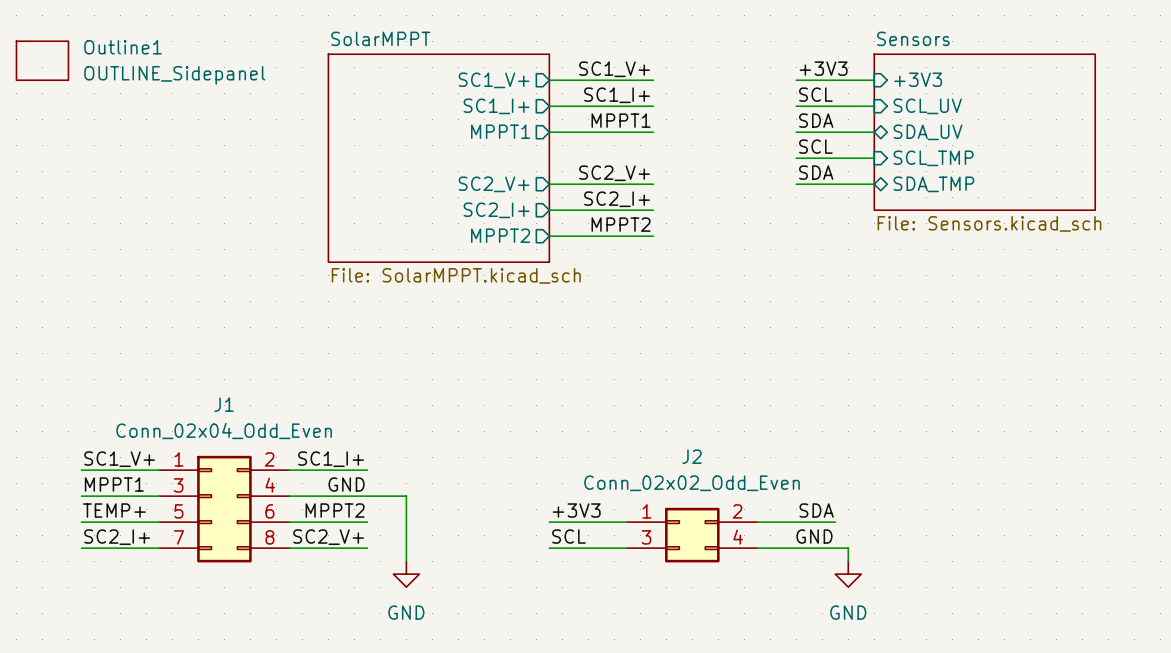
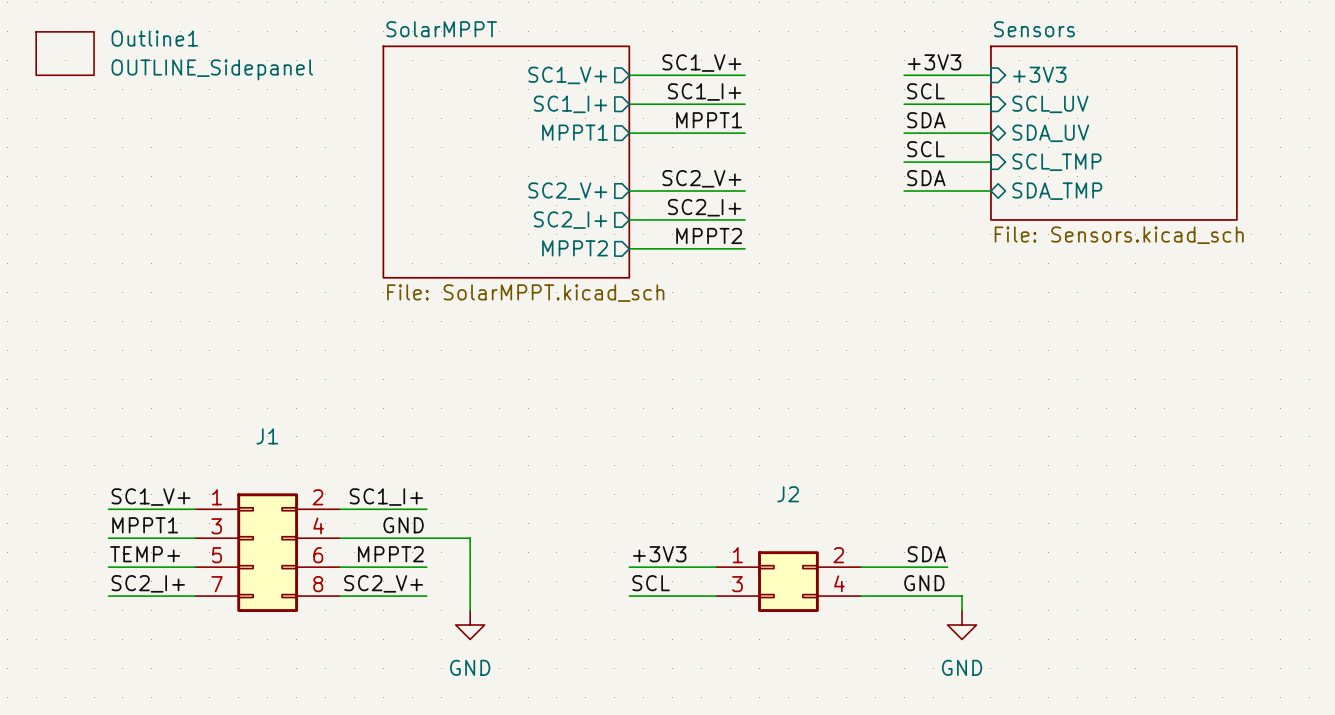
J1 value: Conn_02x04_Odd_Even (224, 430) -> none
J2 value: Conn_02x02_Odd_Even (692, 483) -> none

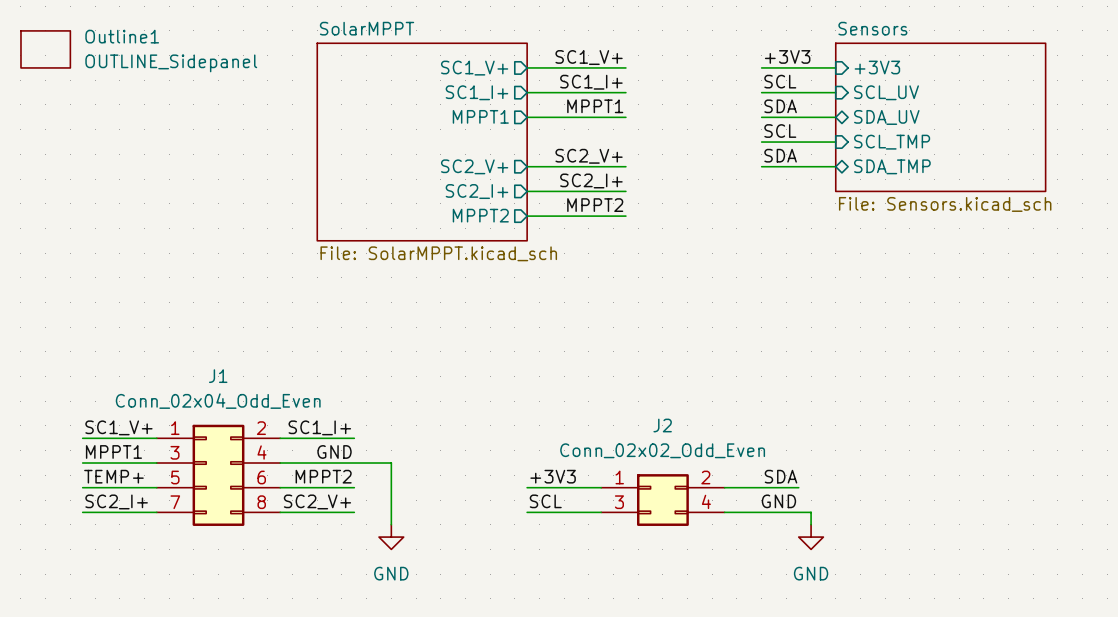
J1 value: none -> Conn_02x04_Odd_Even (218, 401)
J2 value: none -> Conn_02x02_Odd_Even (662, 450)

